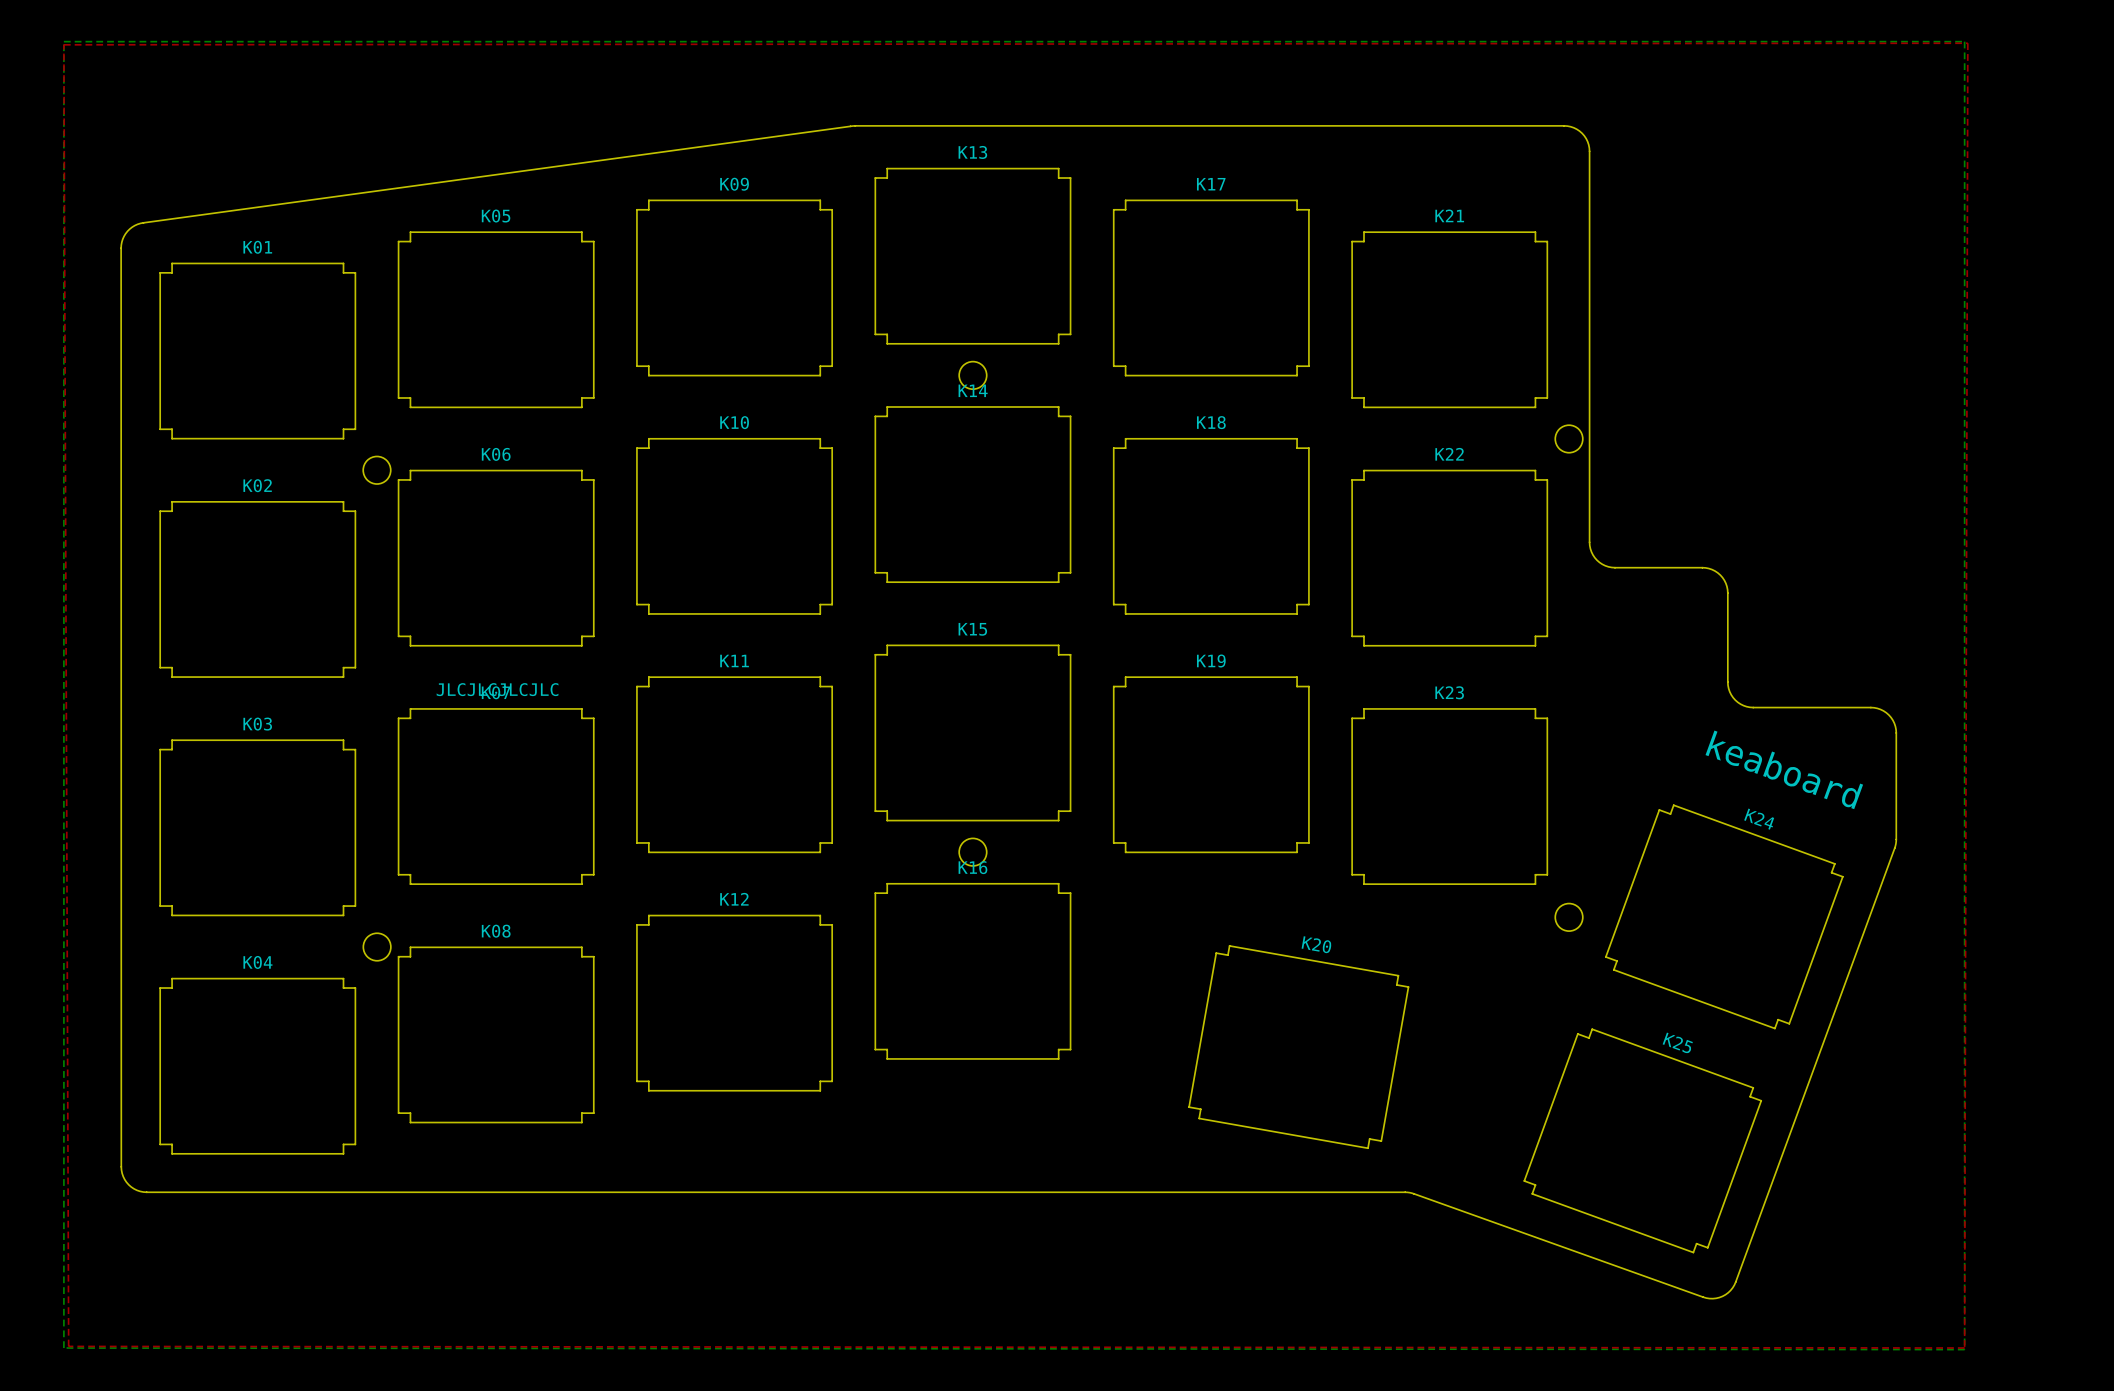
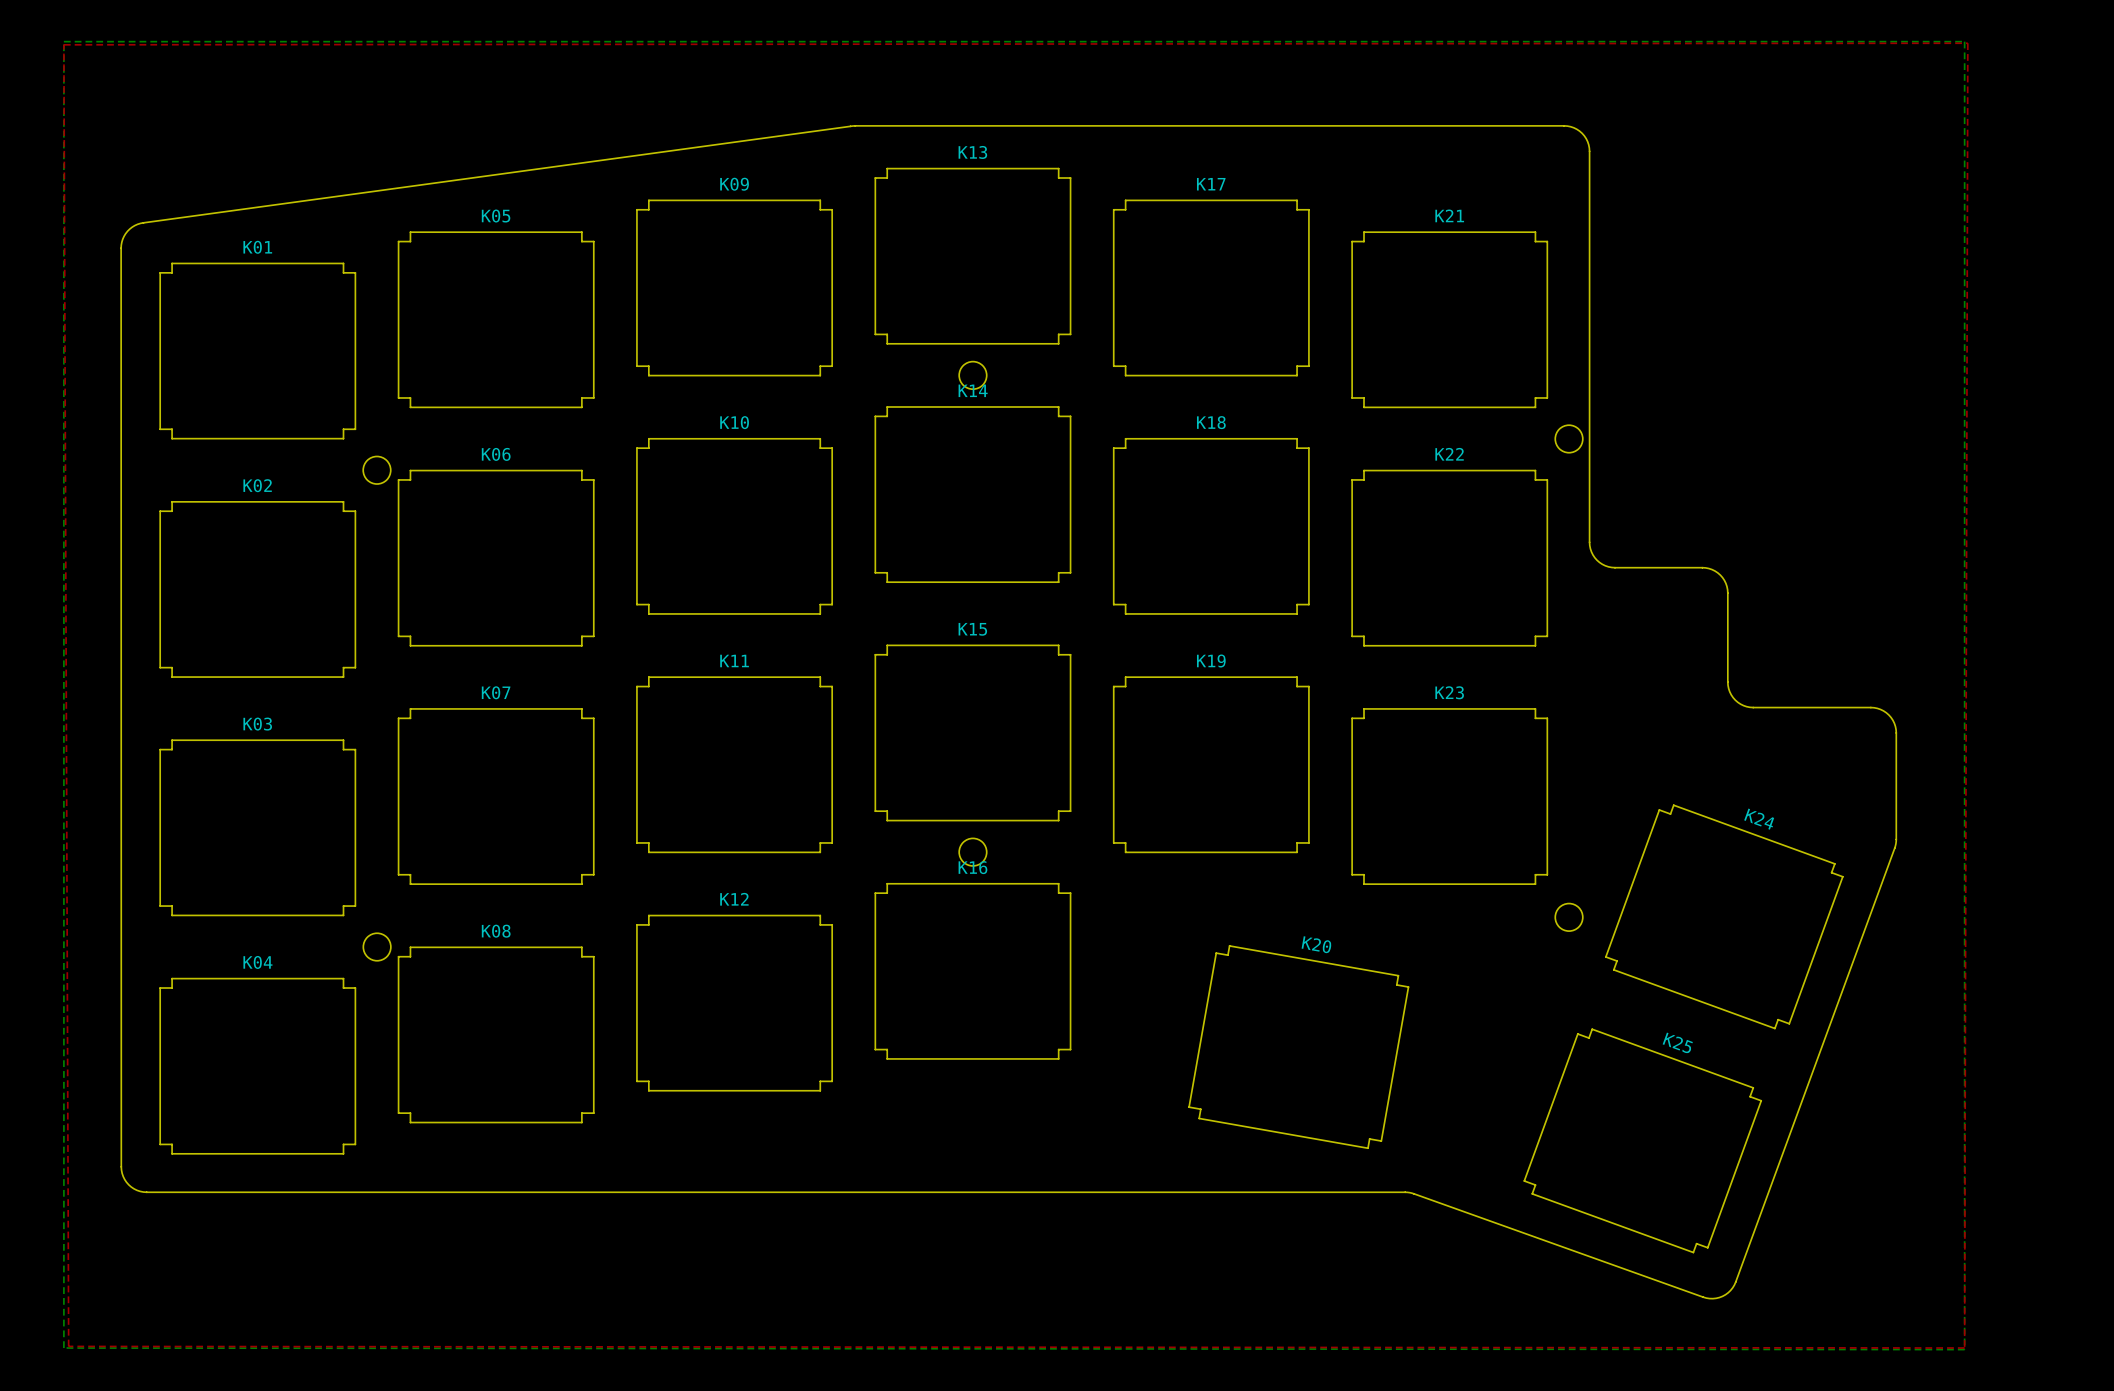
text: JLCJLCJLCJLC (497, 689) -> none
text: keaboard (1784, 769) -> none

